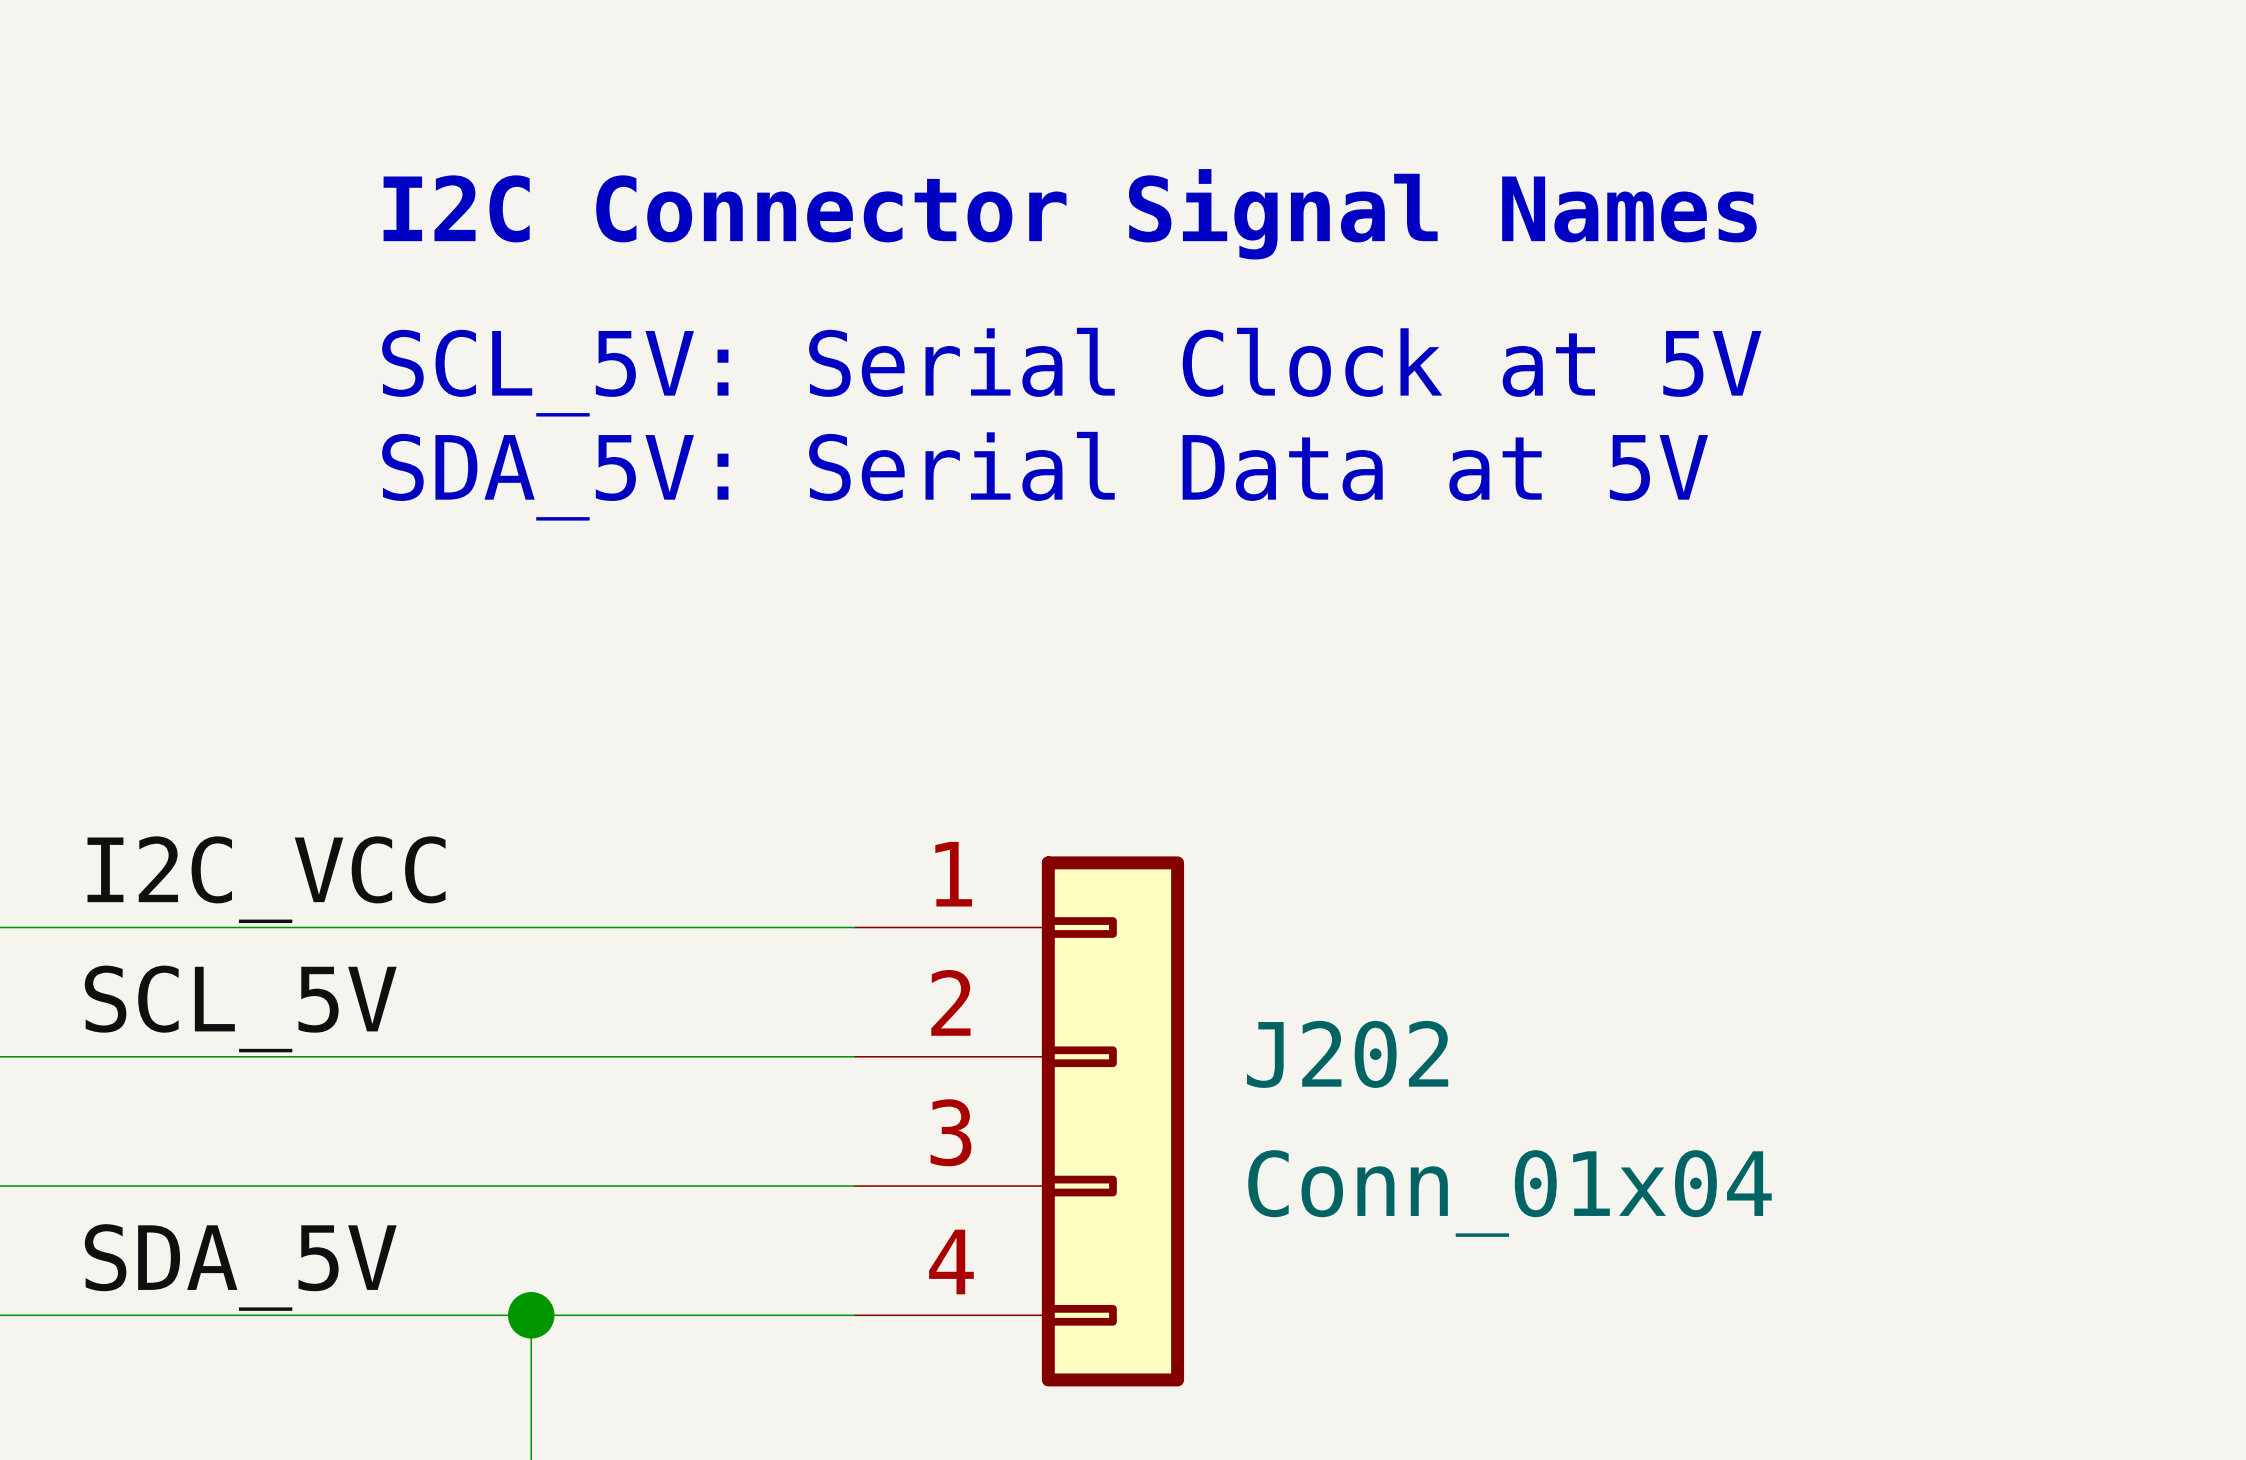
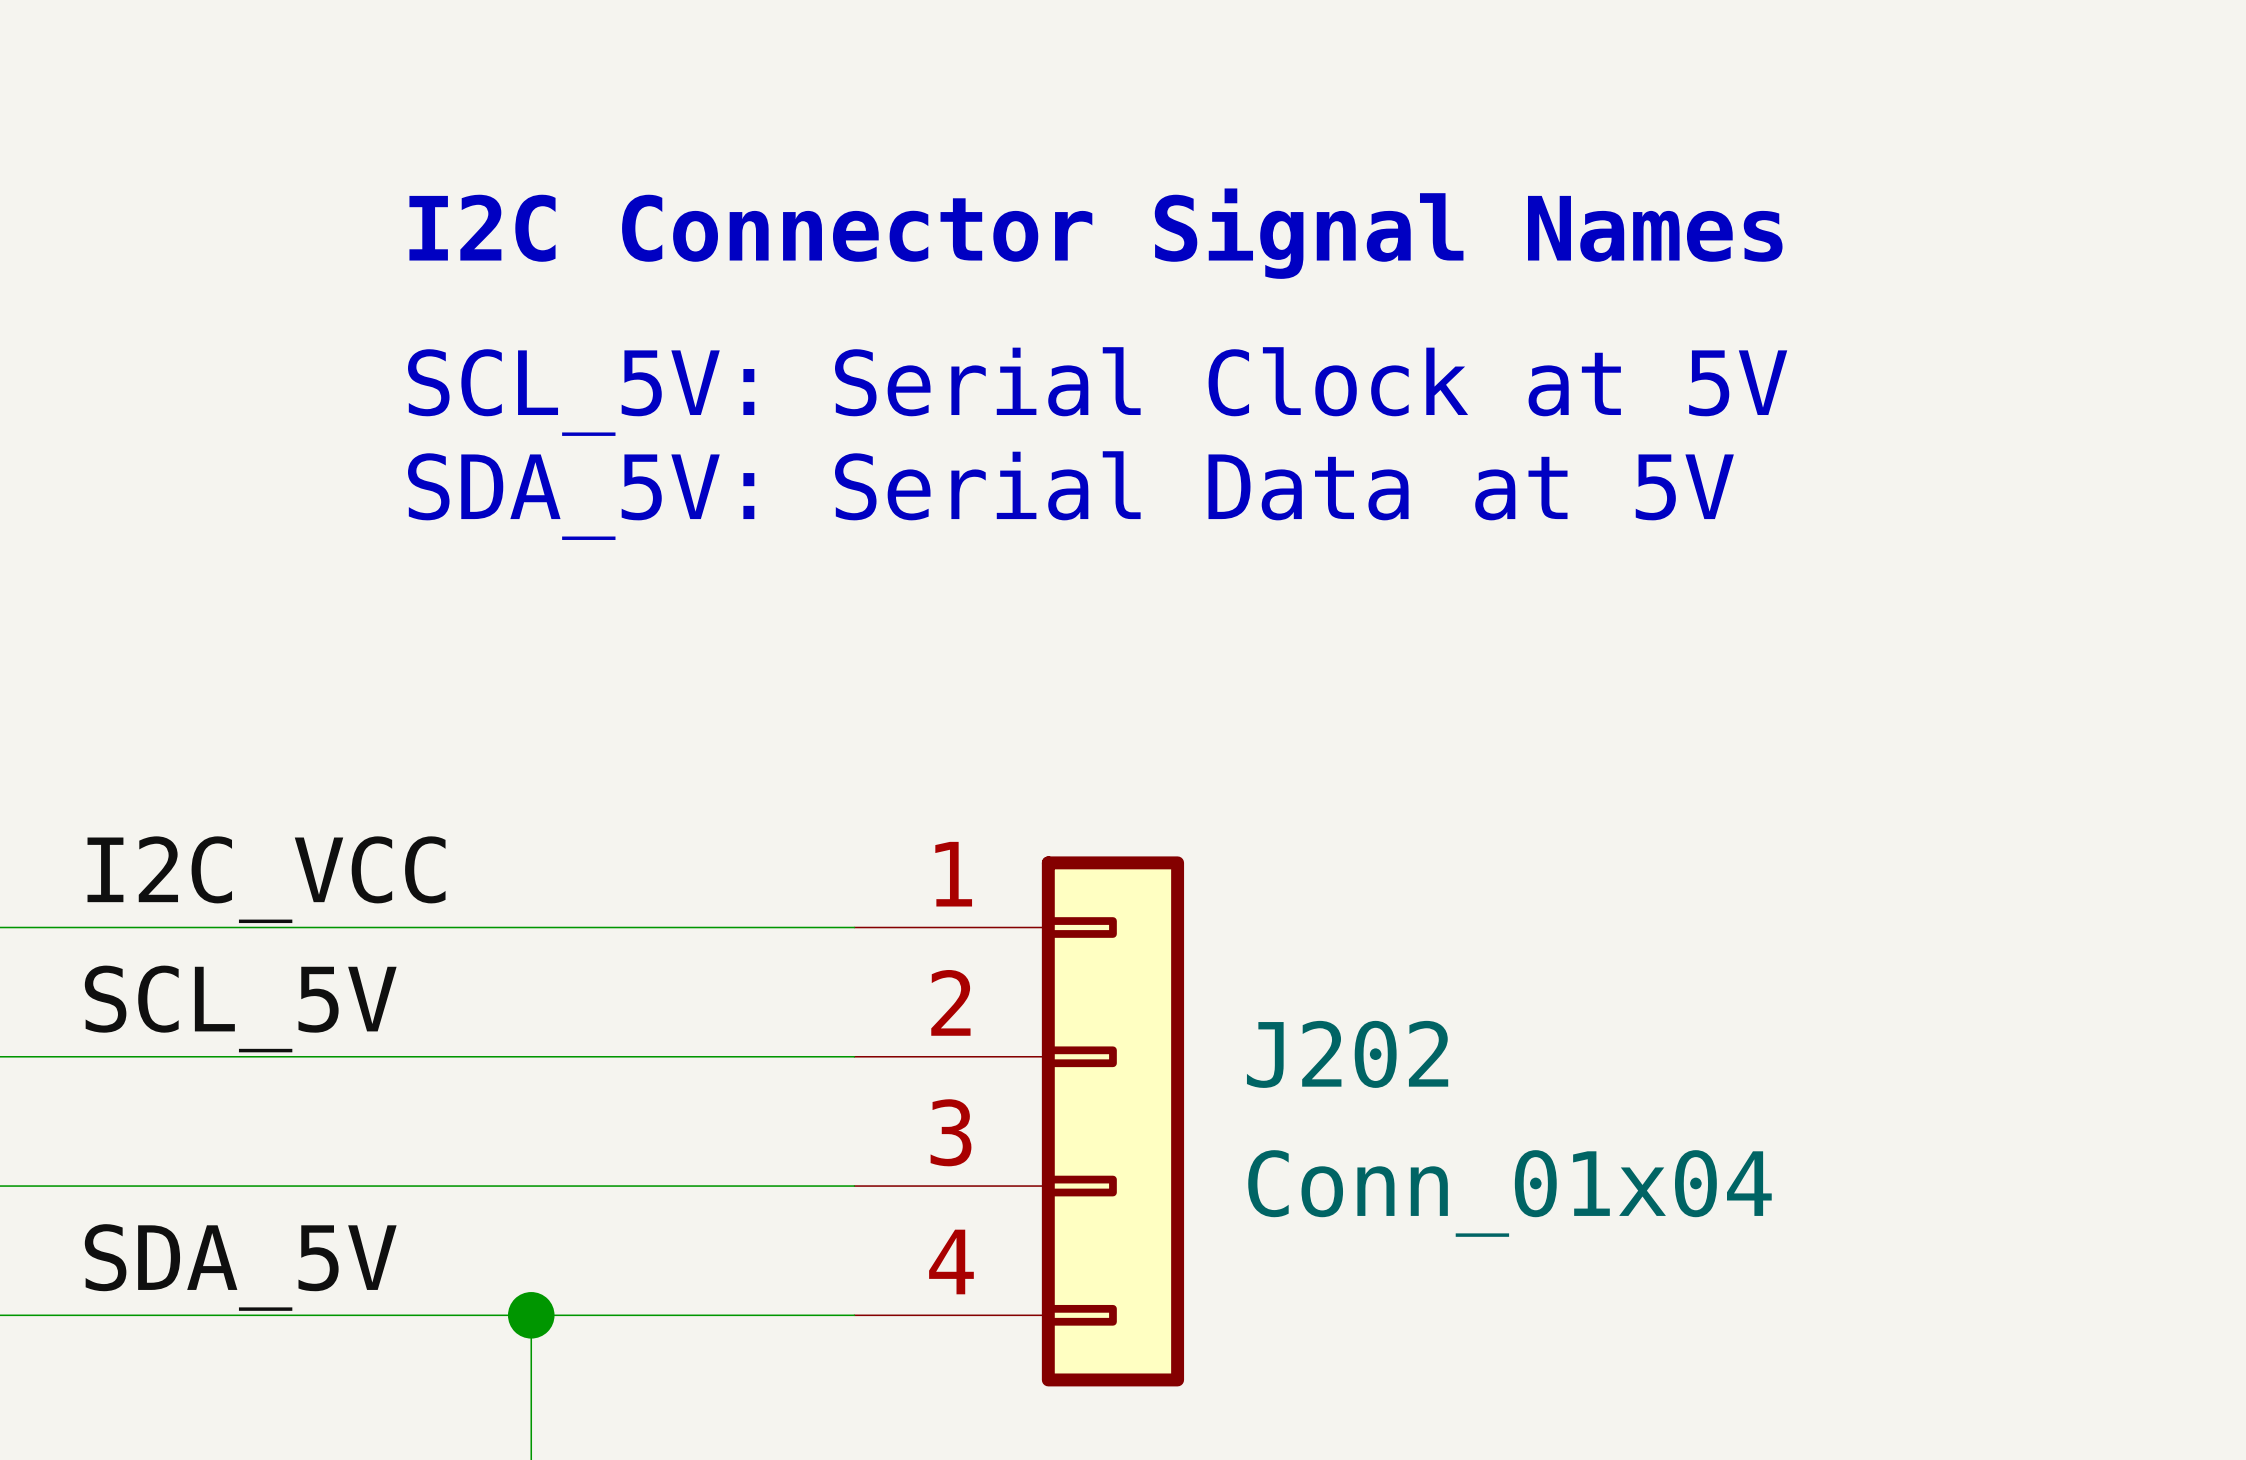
text position: I2C Connector Signal Names (1070, 214) -> I2C Connector Signal Names (1095, 233)
text position: SCL_5V: Serial Clock at 5V (1071, 372) -> SCL_5V: Serial Clock at 5V (1097, 391)
text position: SDA_5V: Serial Data at 5V (1045, 476) -> SDA_5V: Serial Data at 5V (1070, 495)

